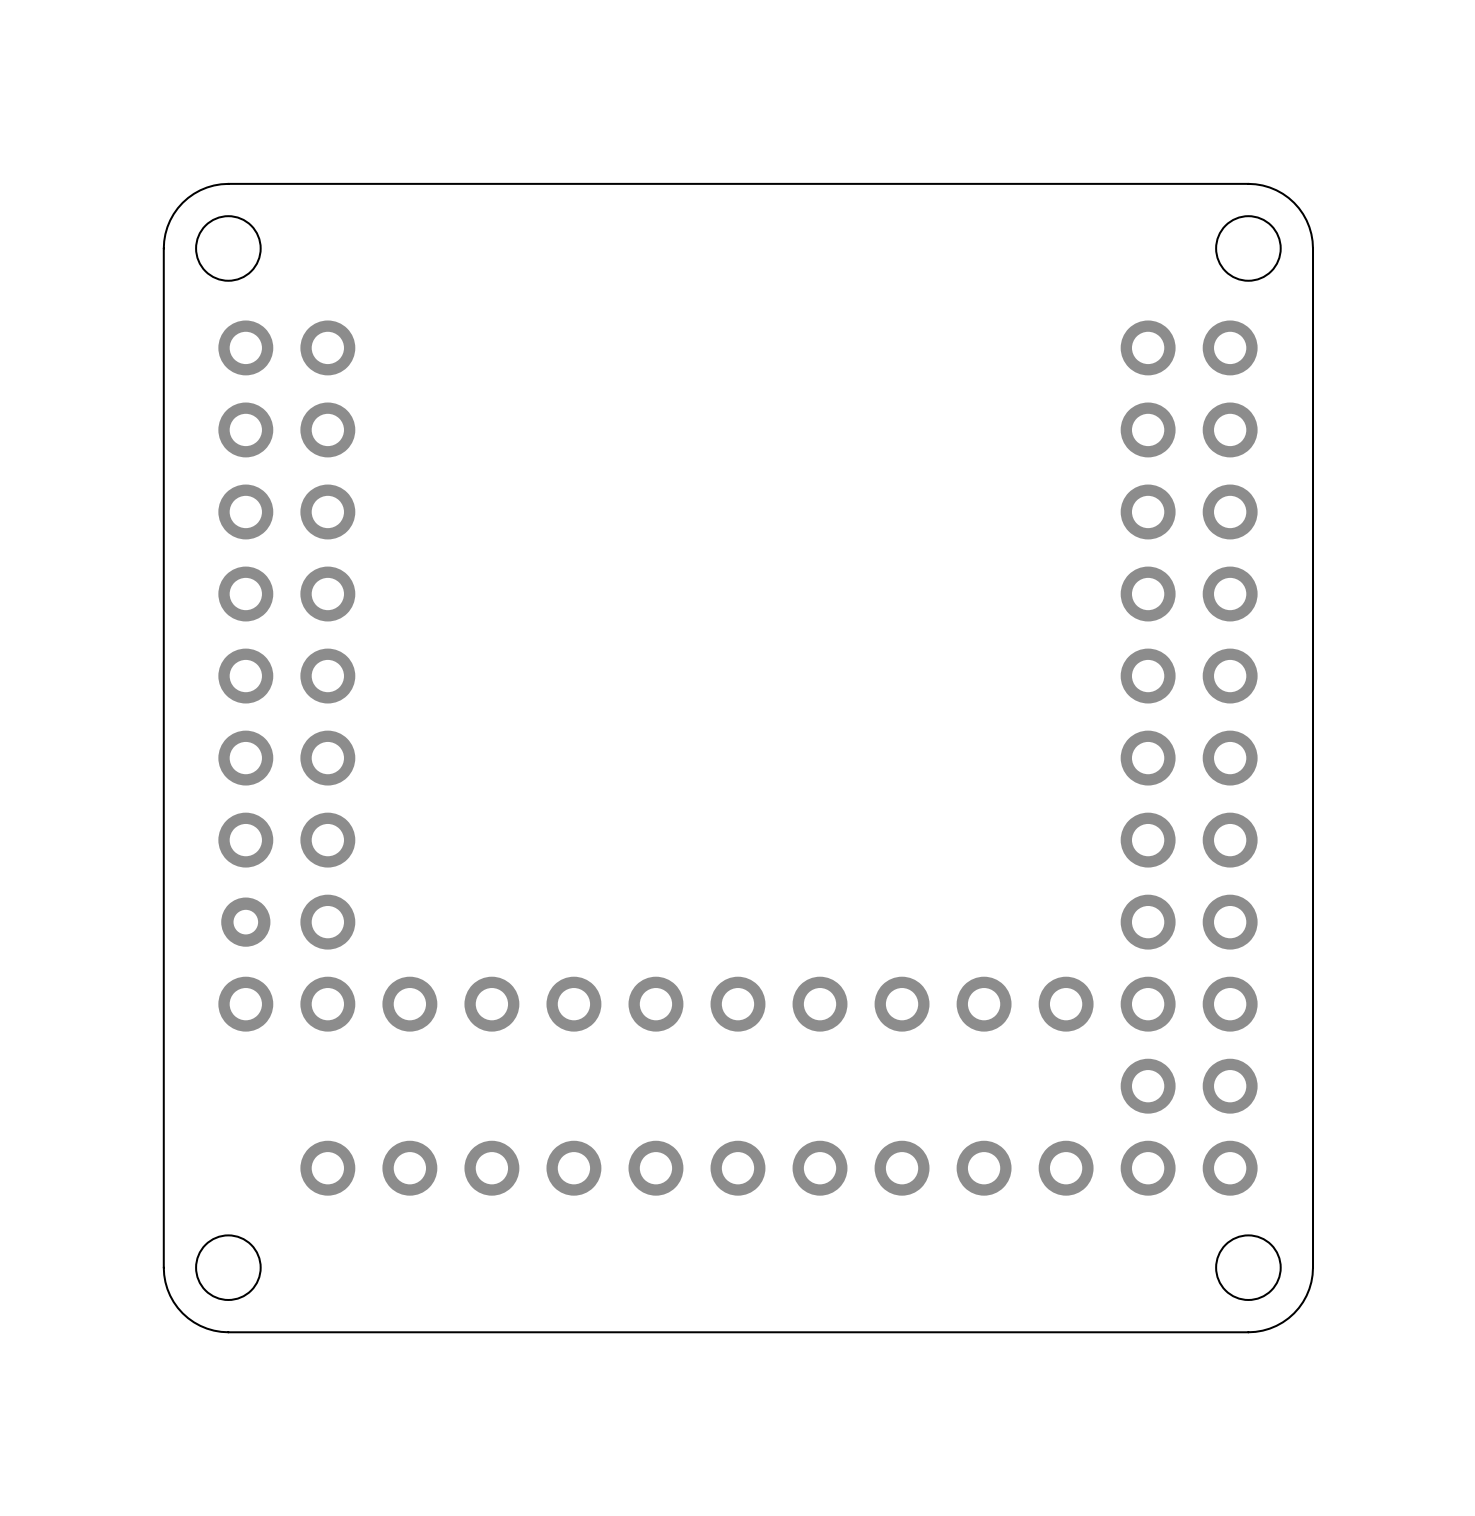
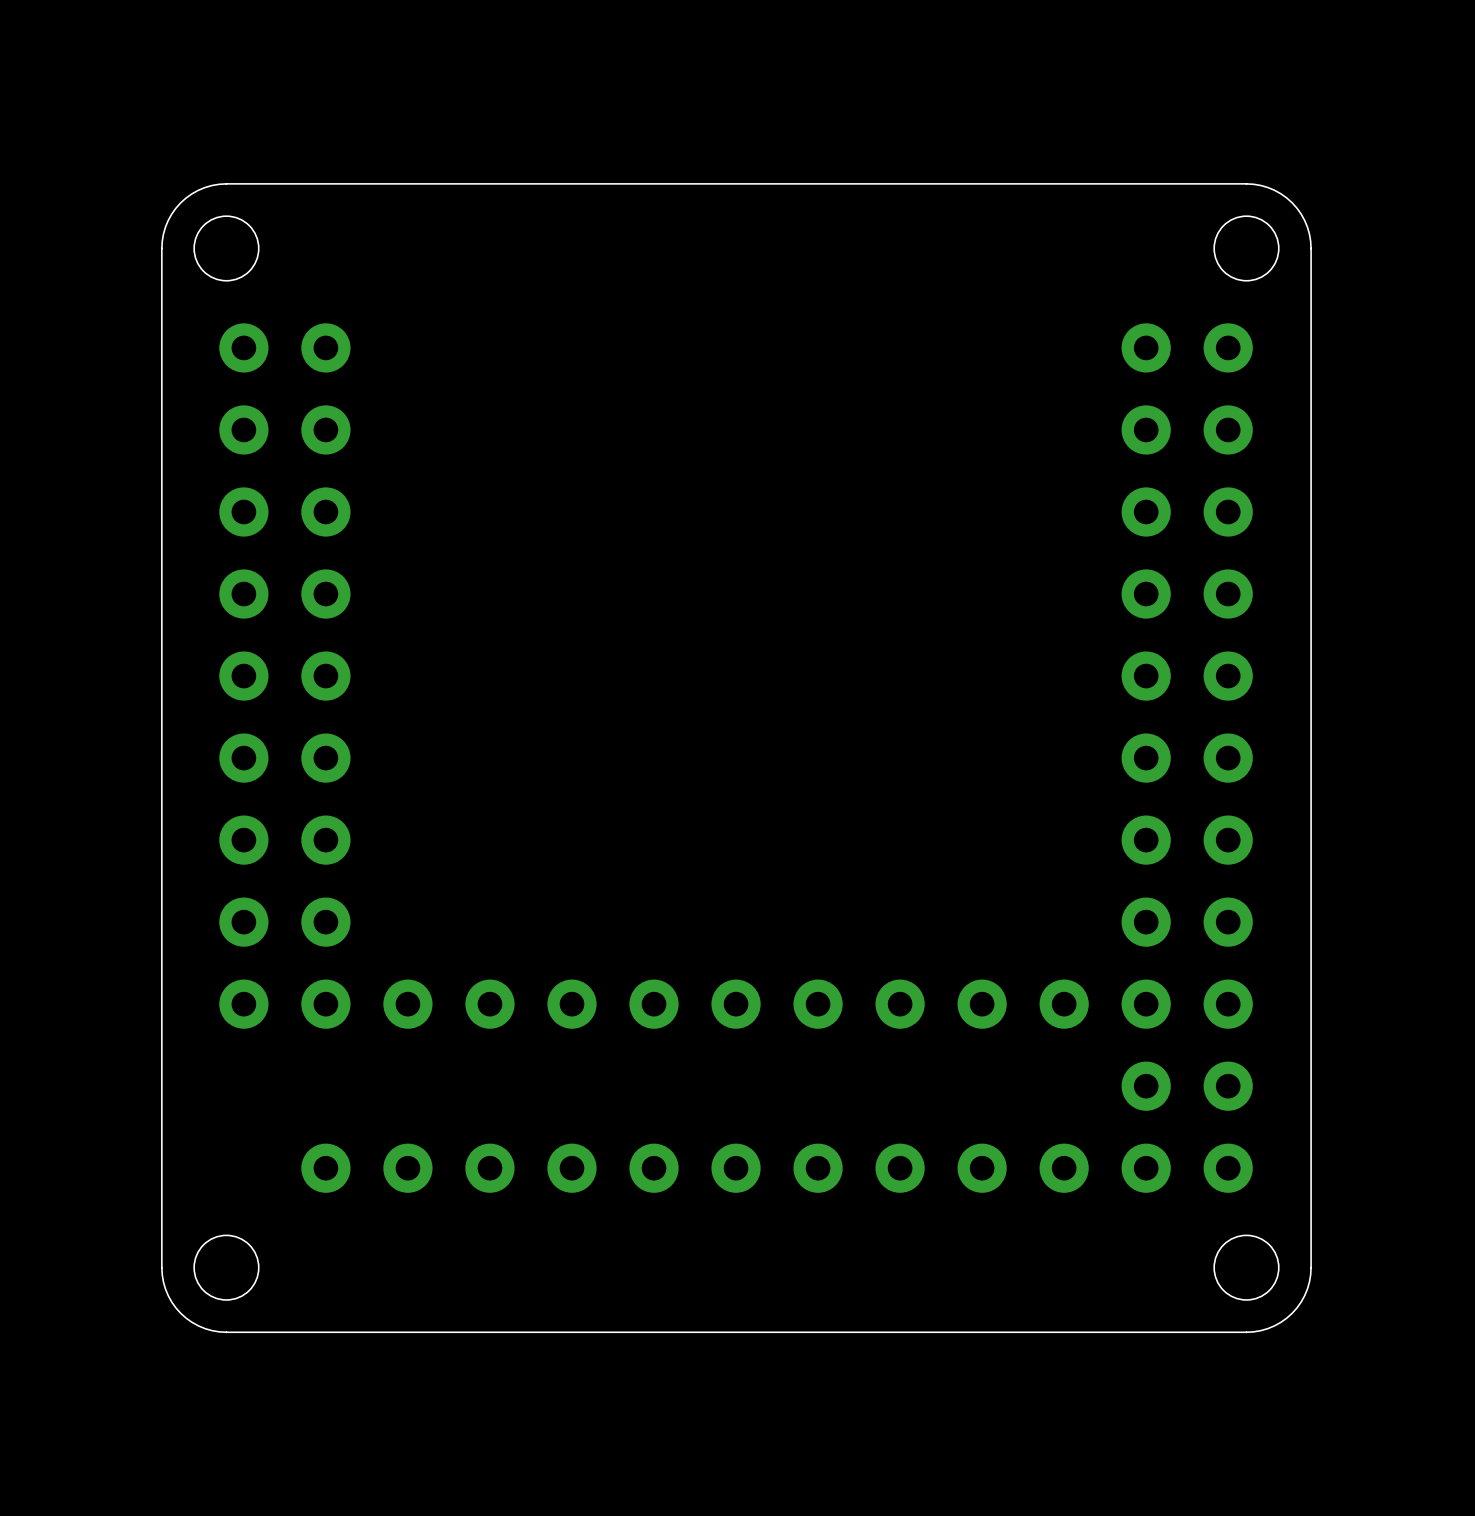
part footprint: [162, 183, 1314, 1334] -> [161, 183, 1312, 1334]

